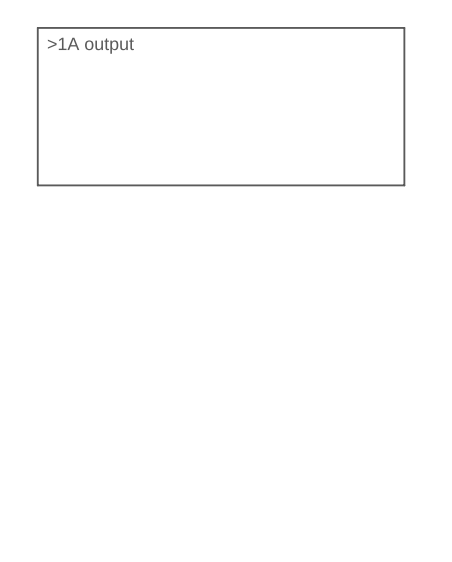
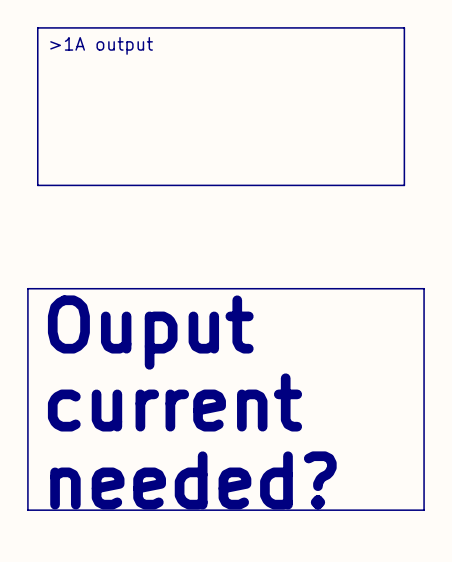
line: none -> (27, 288) (424, 288) (424, 510) (27, 510) (27, 288)
text: none -> Ouput (150, 332)
text: none -> current (174, 402)
text: none -> needed? (193, 480)

